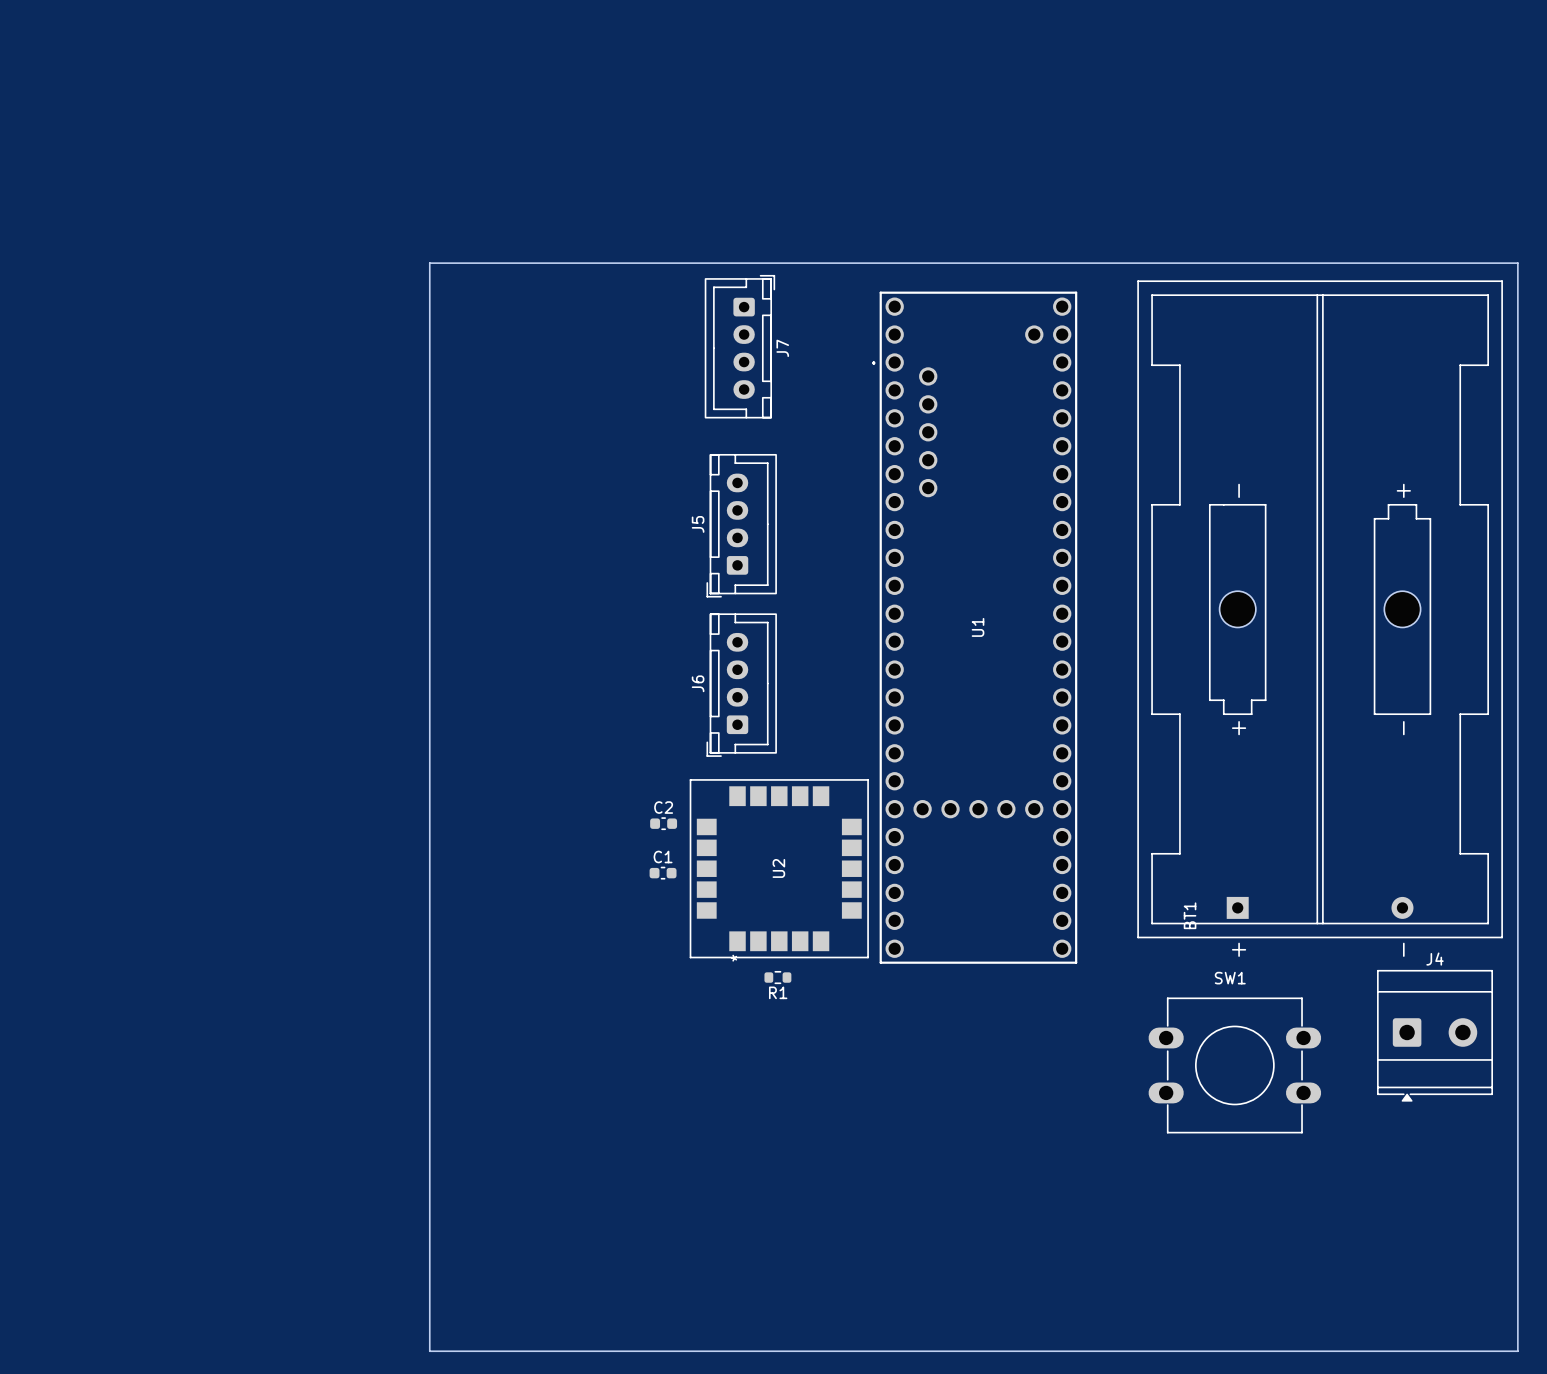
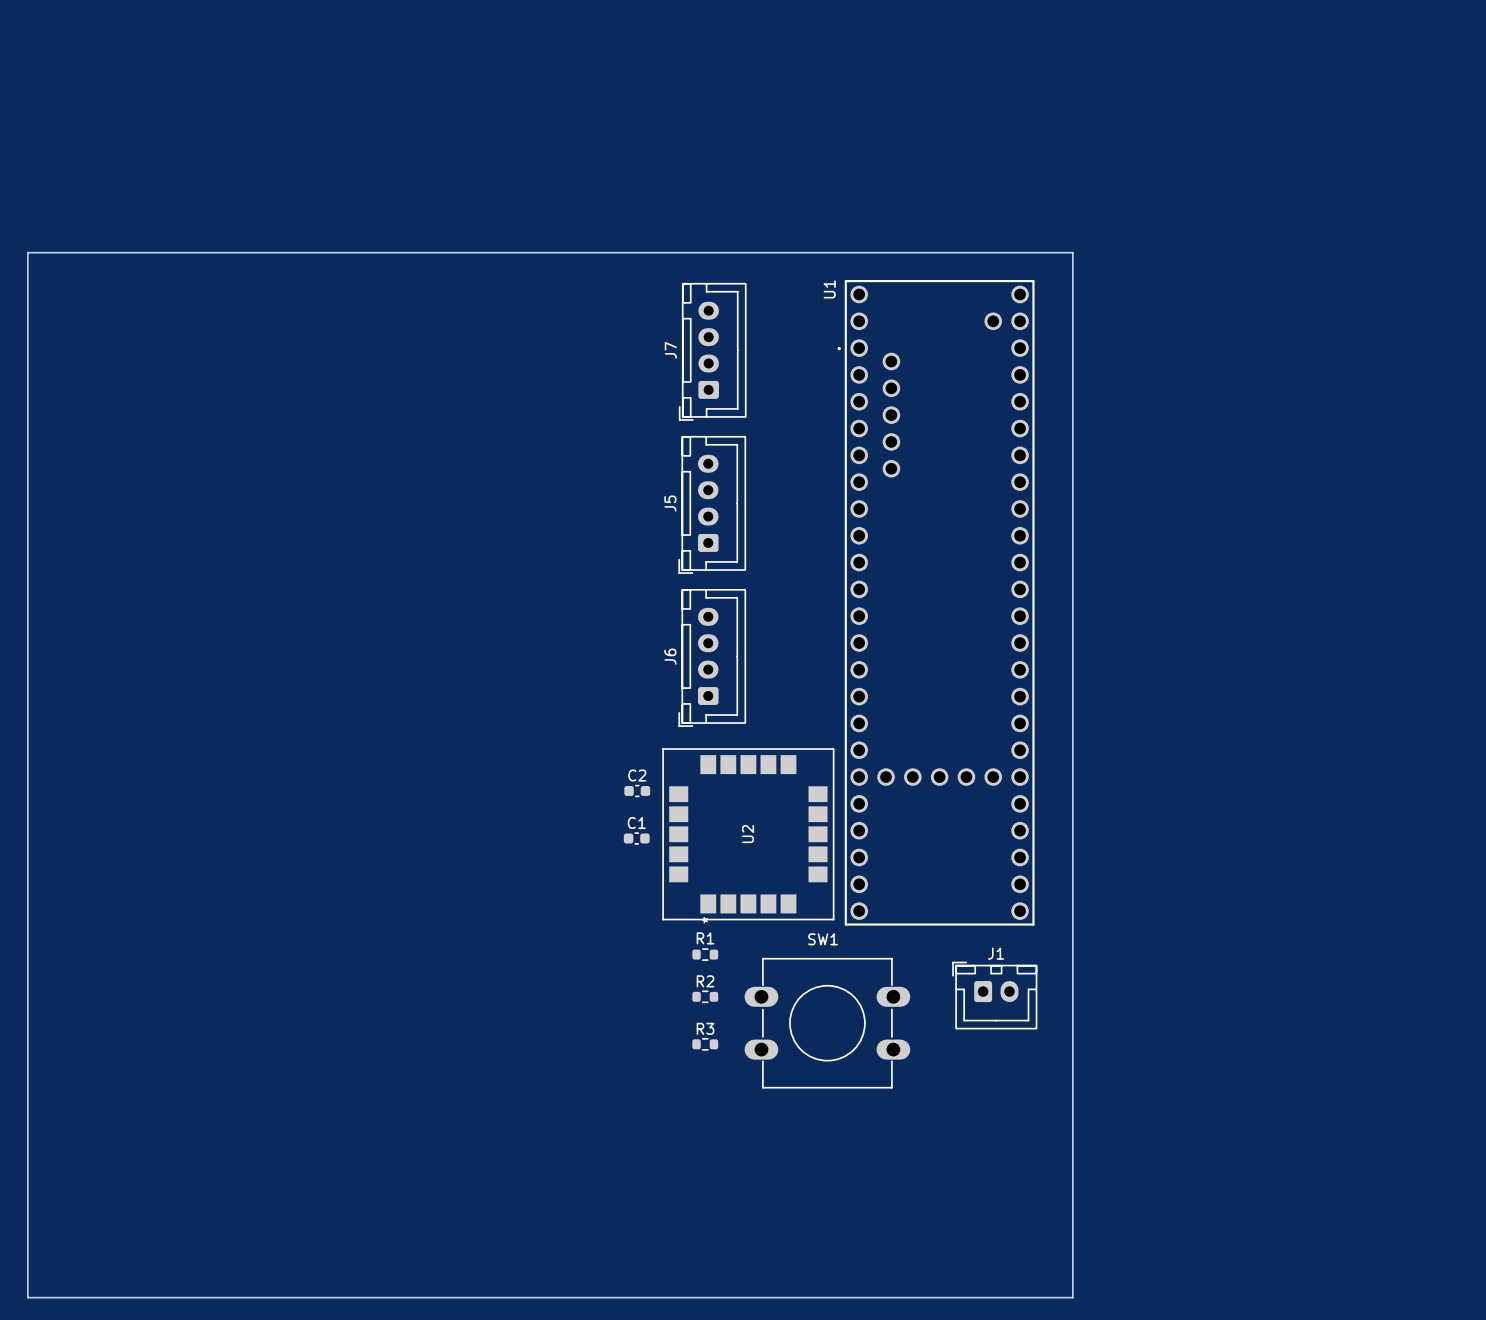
board edge: (429, 263) (429, 1351) -> (412, 252) (27, 252) (27, 1297) (412, 1297)
board edge: (1117, 263) (1517, 263) (1517, 1351) (1117, 1351) -> (1072, 252) (1072, 1297)
J7 rotation: 0° (739, 346) -> 180° (712, 351)
BT1: (1320, 609) -> none
U1 name position: U1 (978, 627) -> U1 (829, 289)
R1 position: (777, 977) -> (705, 954)
R1 name position: R1 (778, 992) -> R1 (705, 938)
J4: (1435, 1035) -> none
J1: none -> (994, 995)
R2: none -> (705, 996)
SW1 position: (1234, 1065) -> (827, 1023)
R3: none -> (705, 1044)

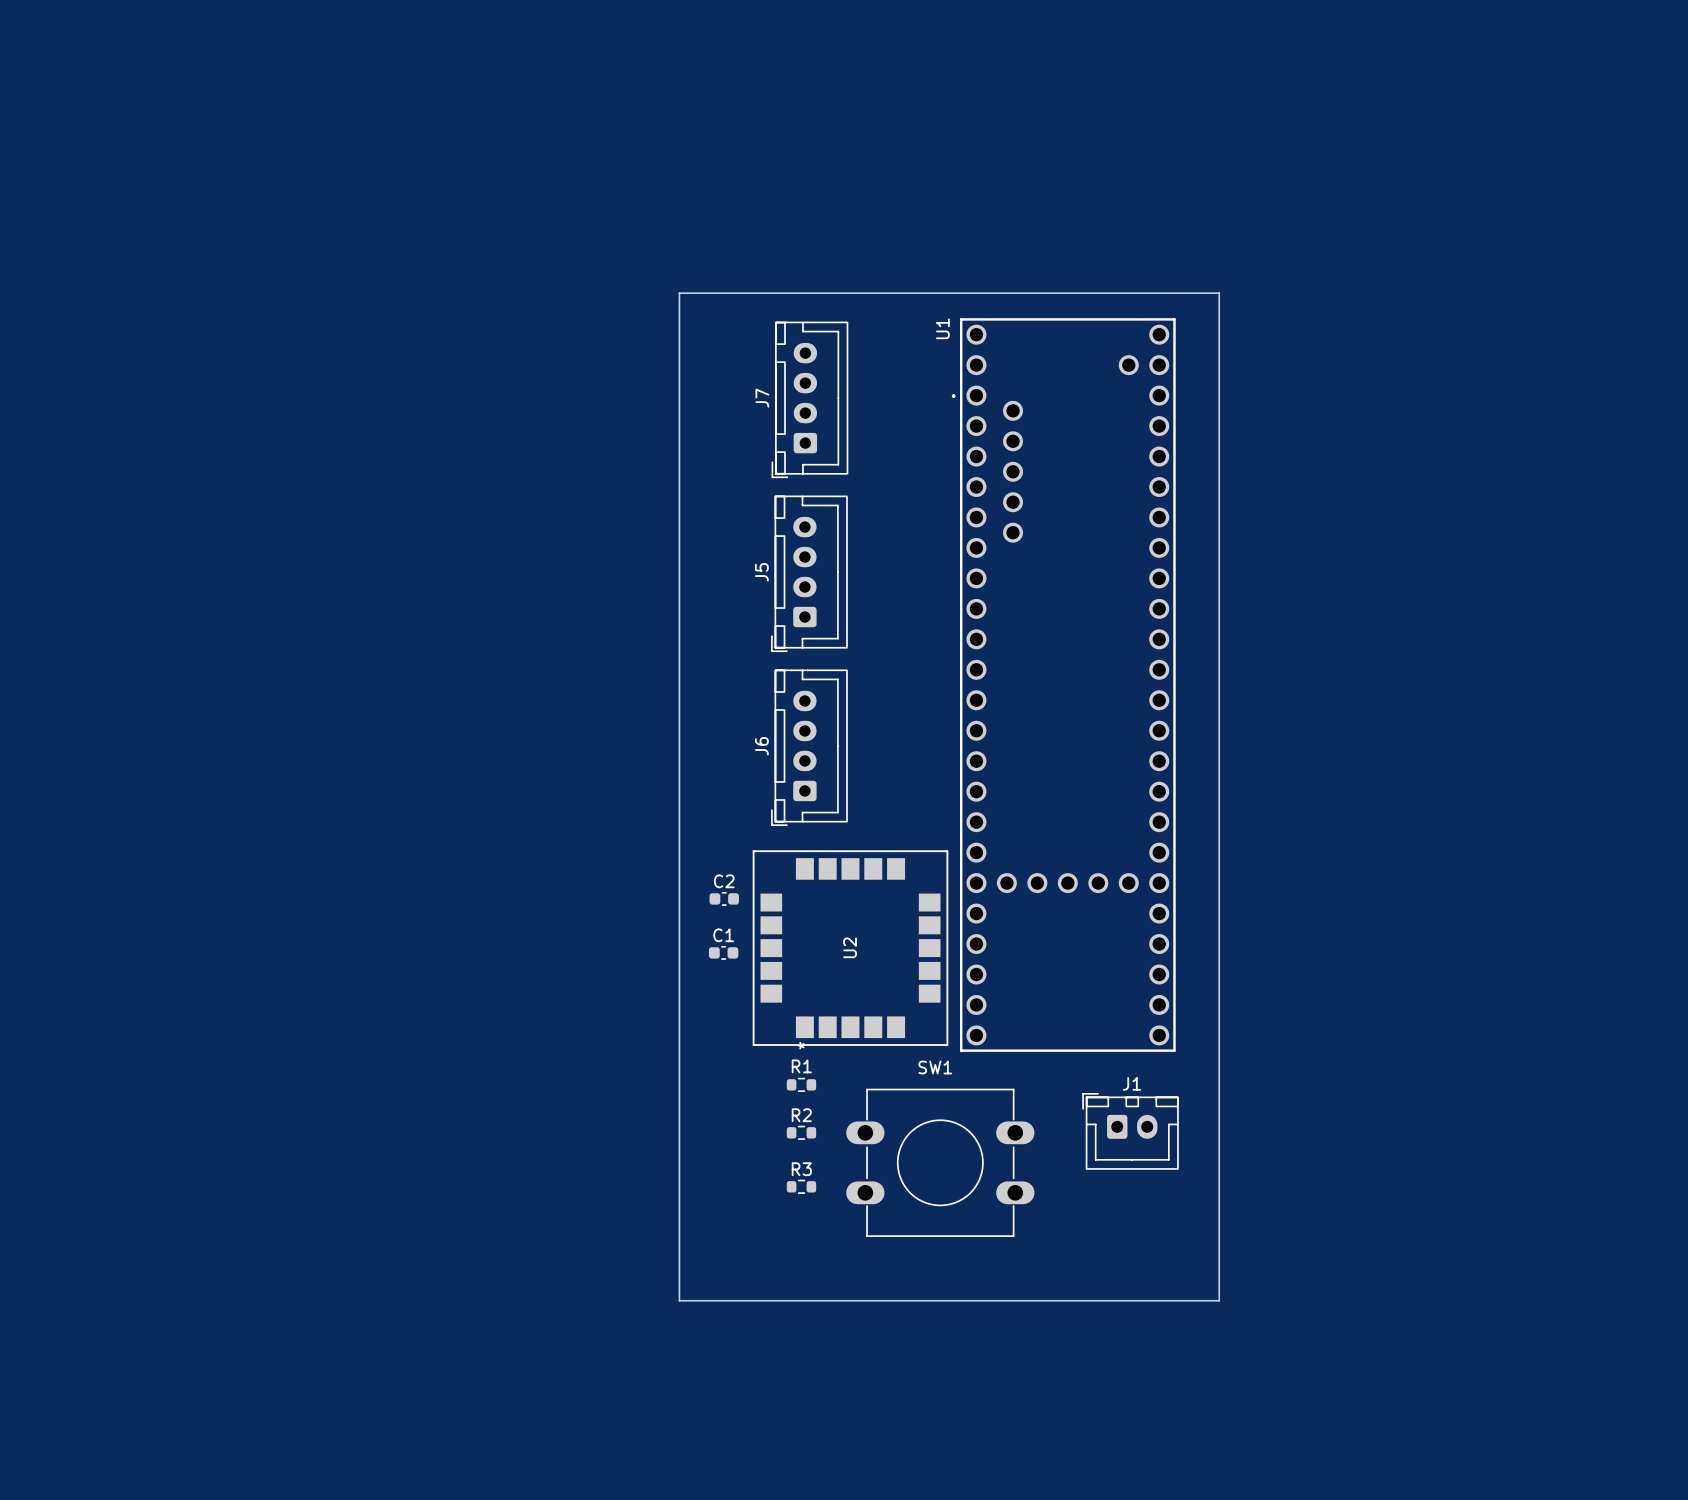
board edge: (1072, 257) (1072, 252) (27, 252) (27, 1297) (1072, 1297) (1072, 1144) -> (1219, 293) (679, 293) (679, 1300) (1219, 1300)

